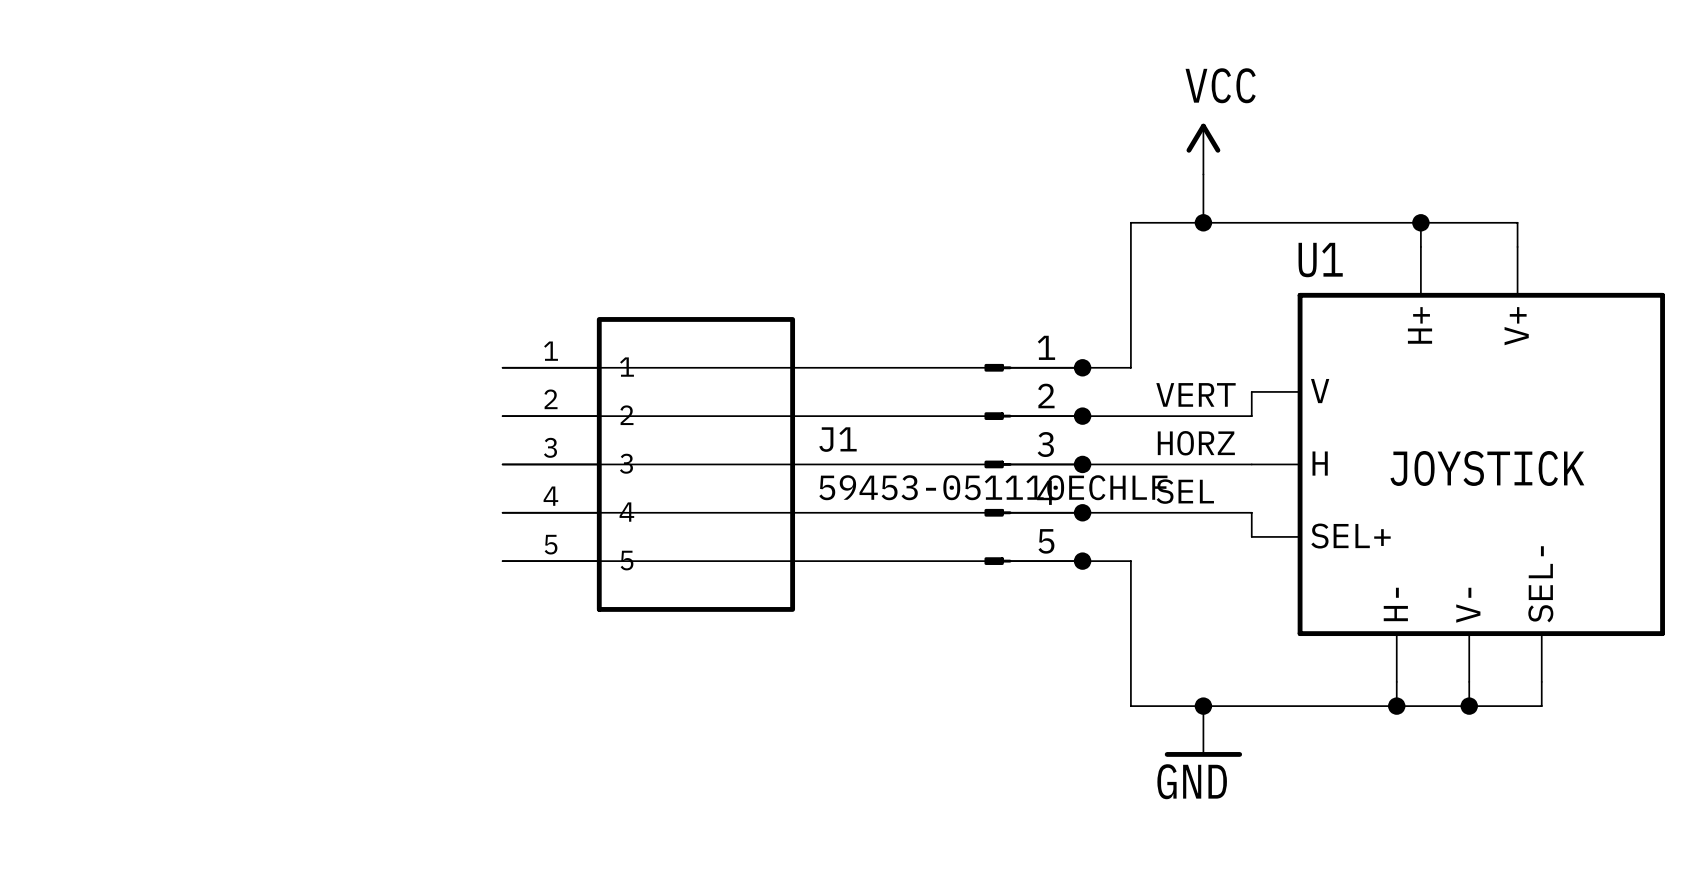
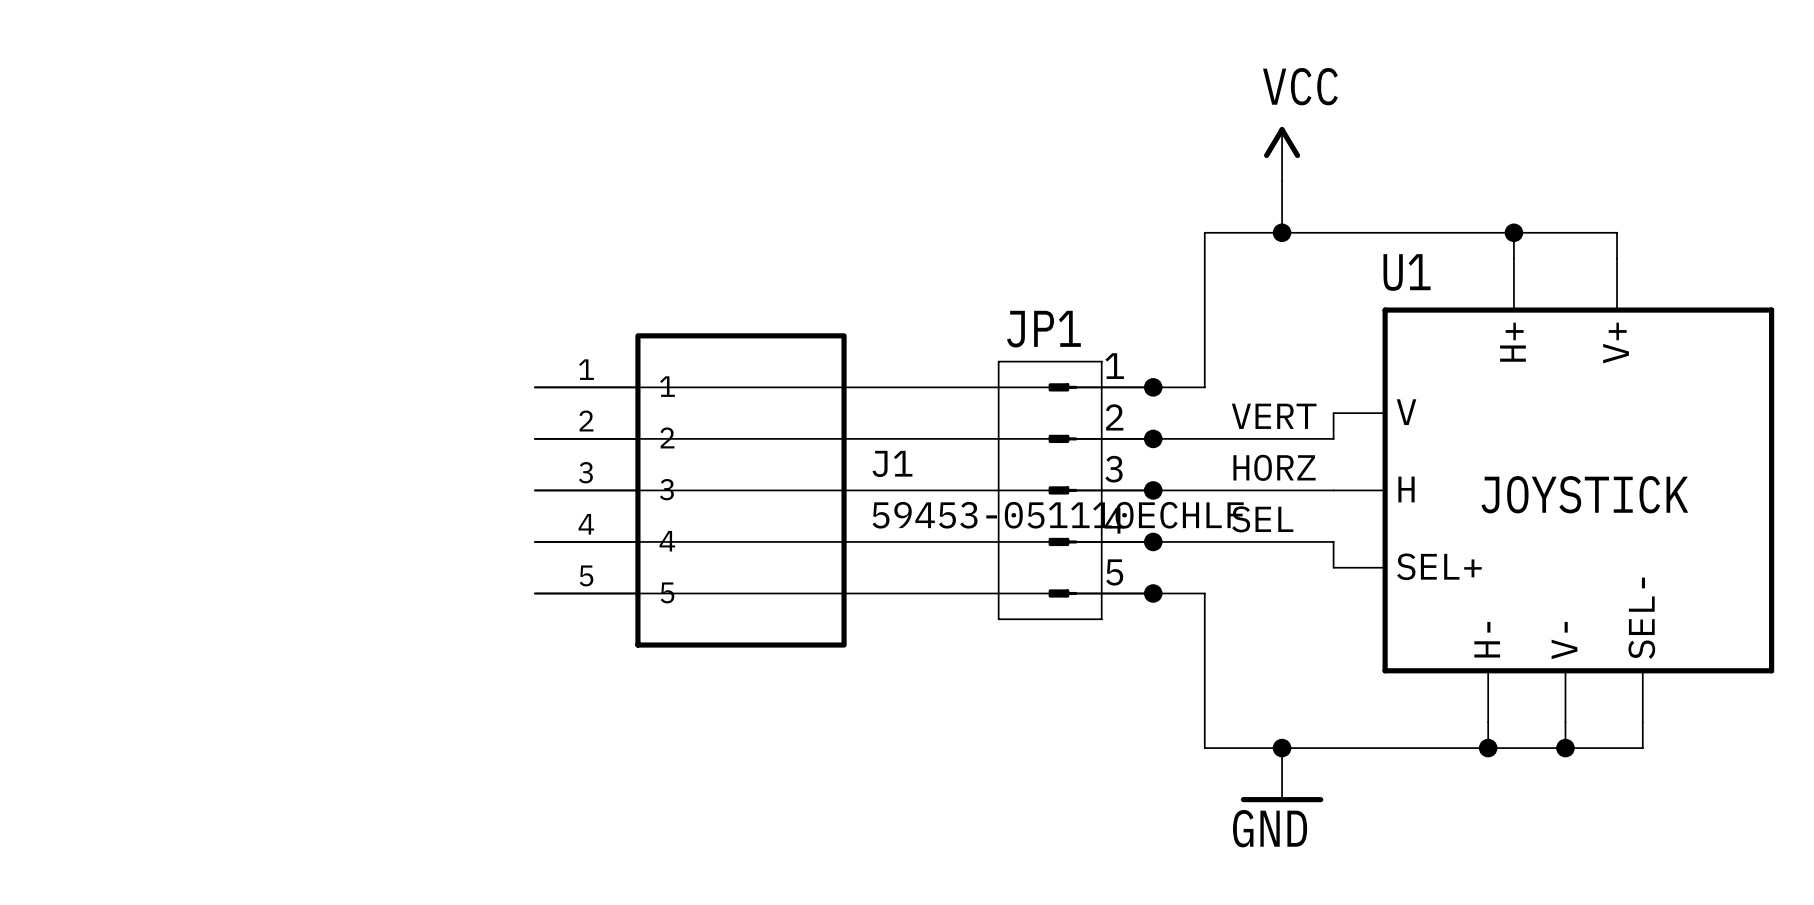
JP1 name: none -> JP1 (1043, 329)
line: none -> (998, 361) (1101, 361) (1101, 619) (998, 619) (998, 361)

